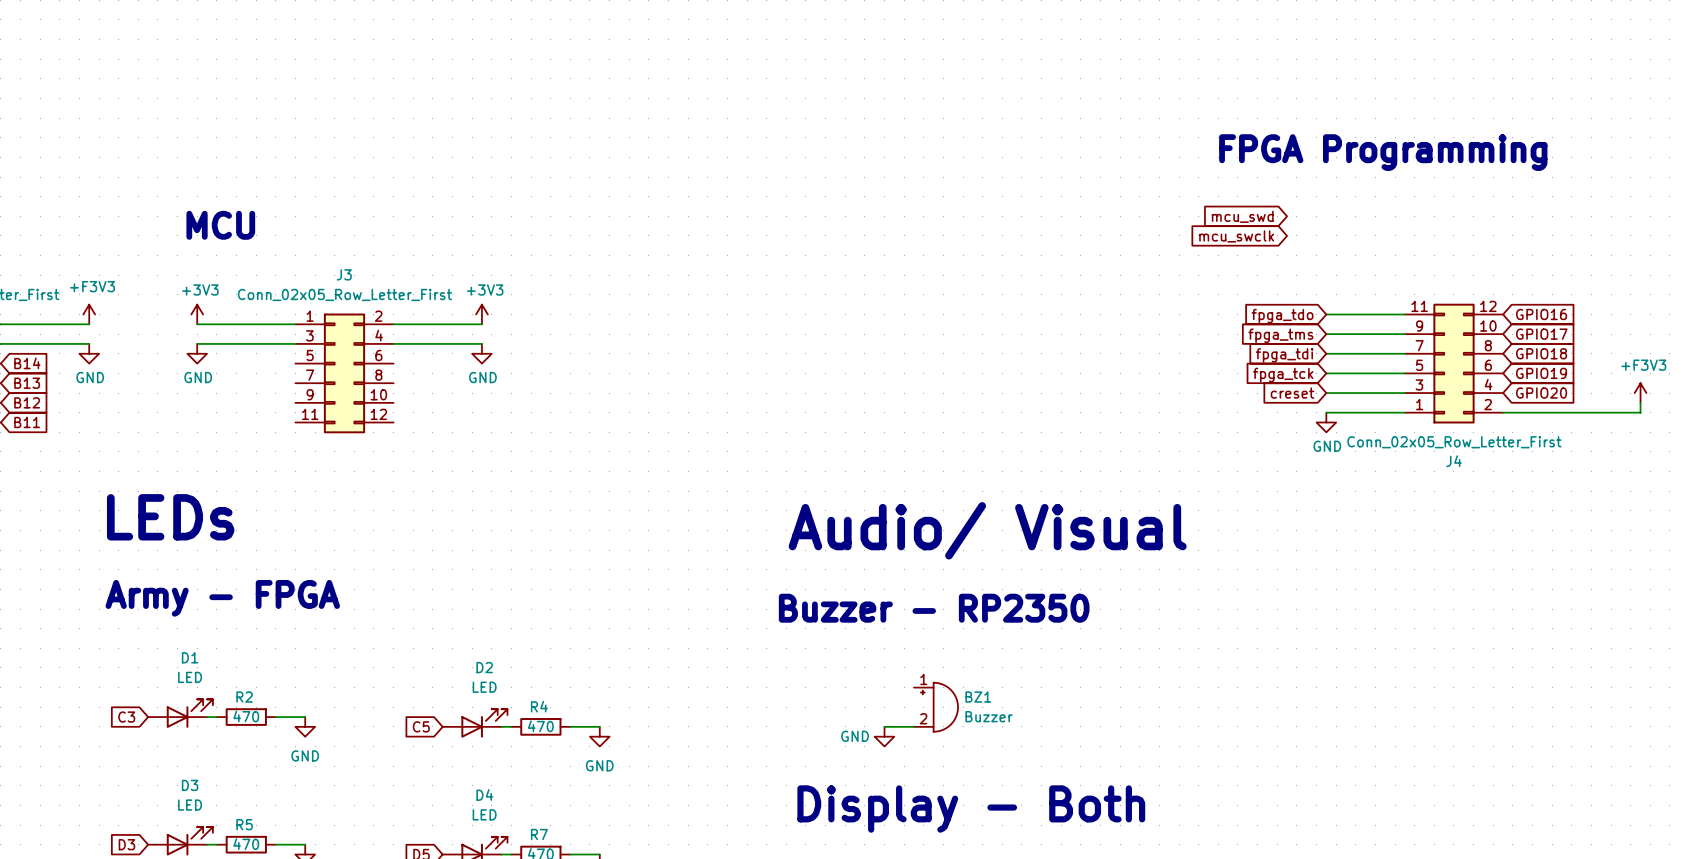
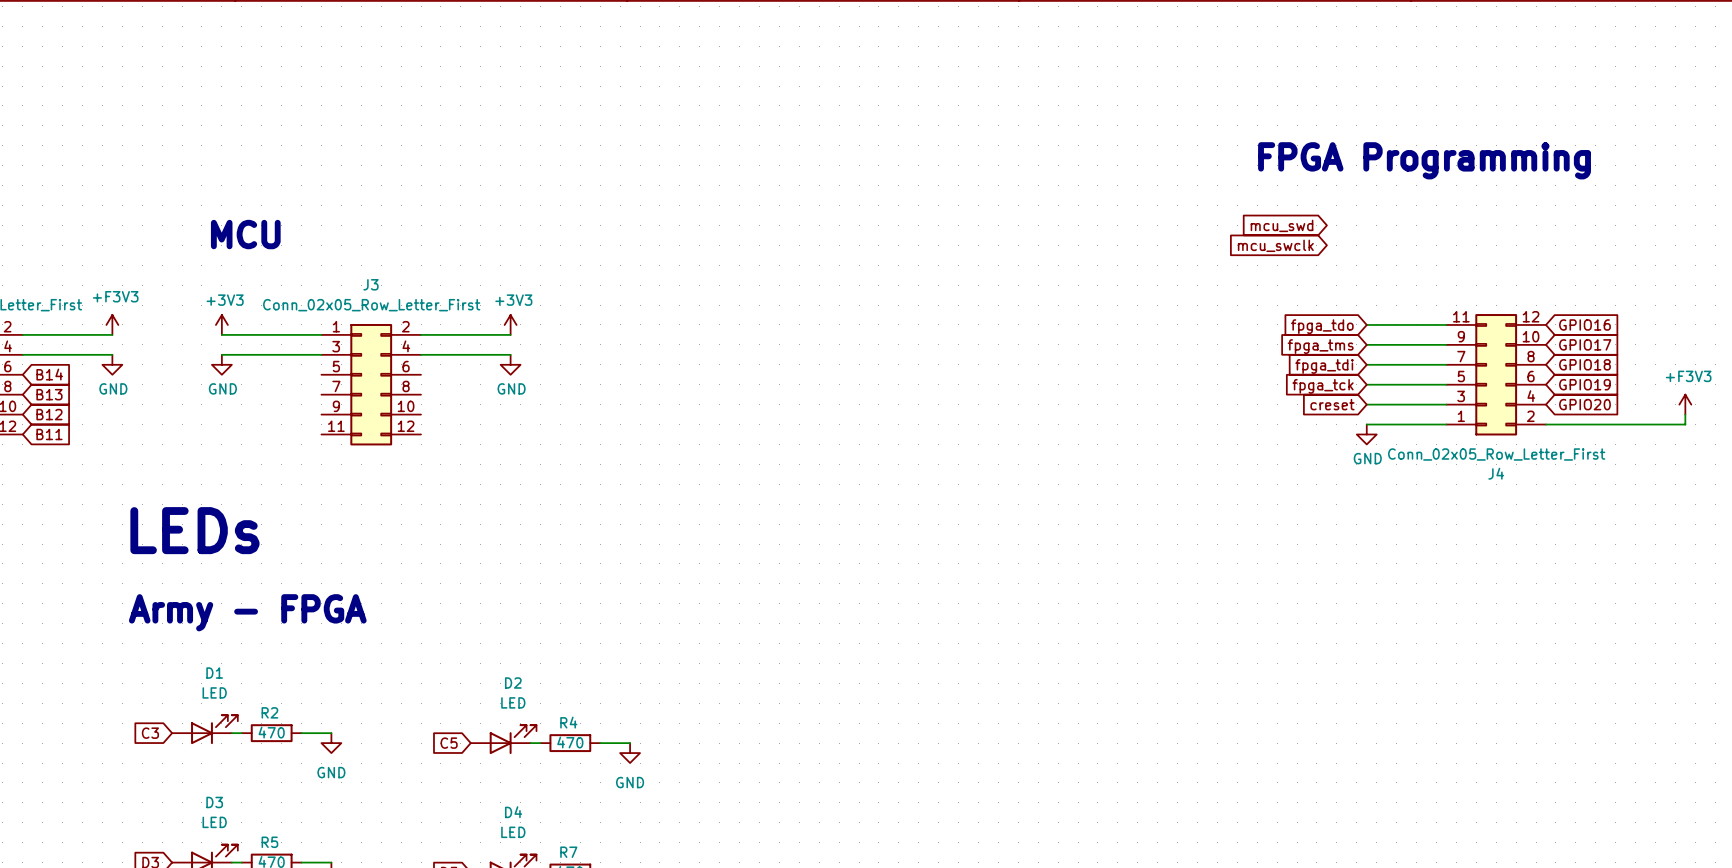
text: Audio/ Visual (987, 530) -> none
text: Buzzer - RP2350 (934, 608) -> none
BZ1: Buzzer (936, 707) -> none
wire: (884, 726) (913, 726) -> none
power symbol: GND (884, 736) -> none
text: Display - Both (971, 809) -> none

